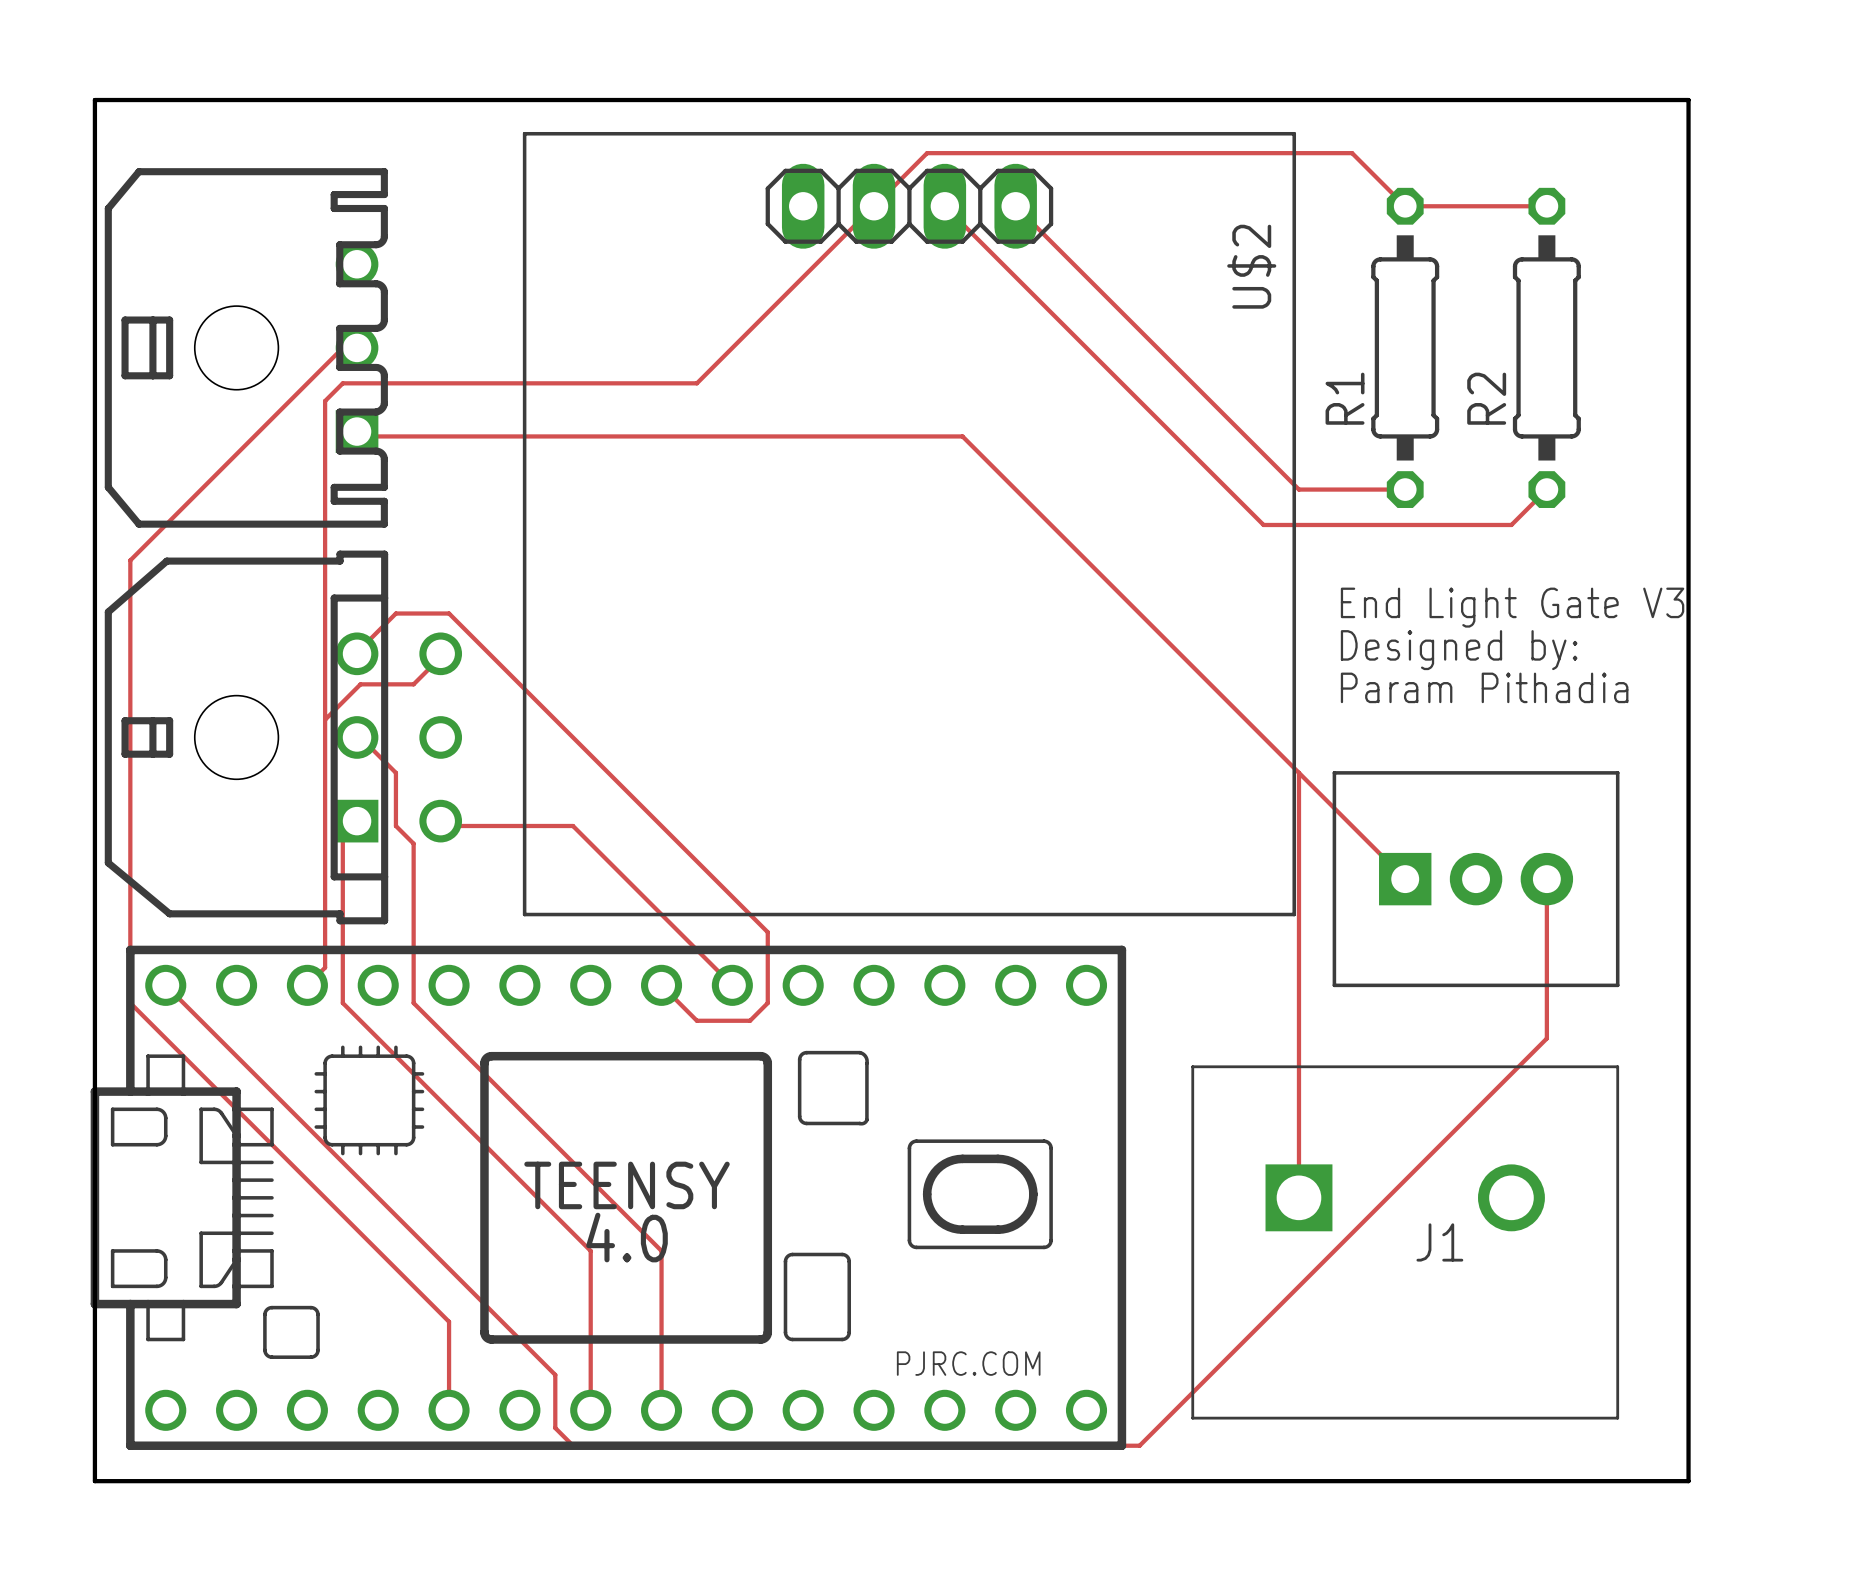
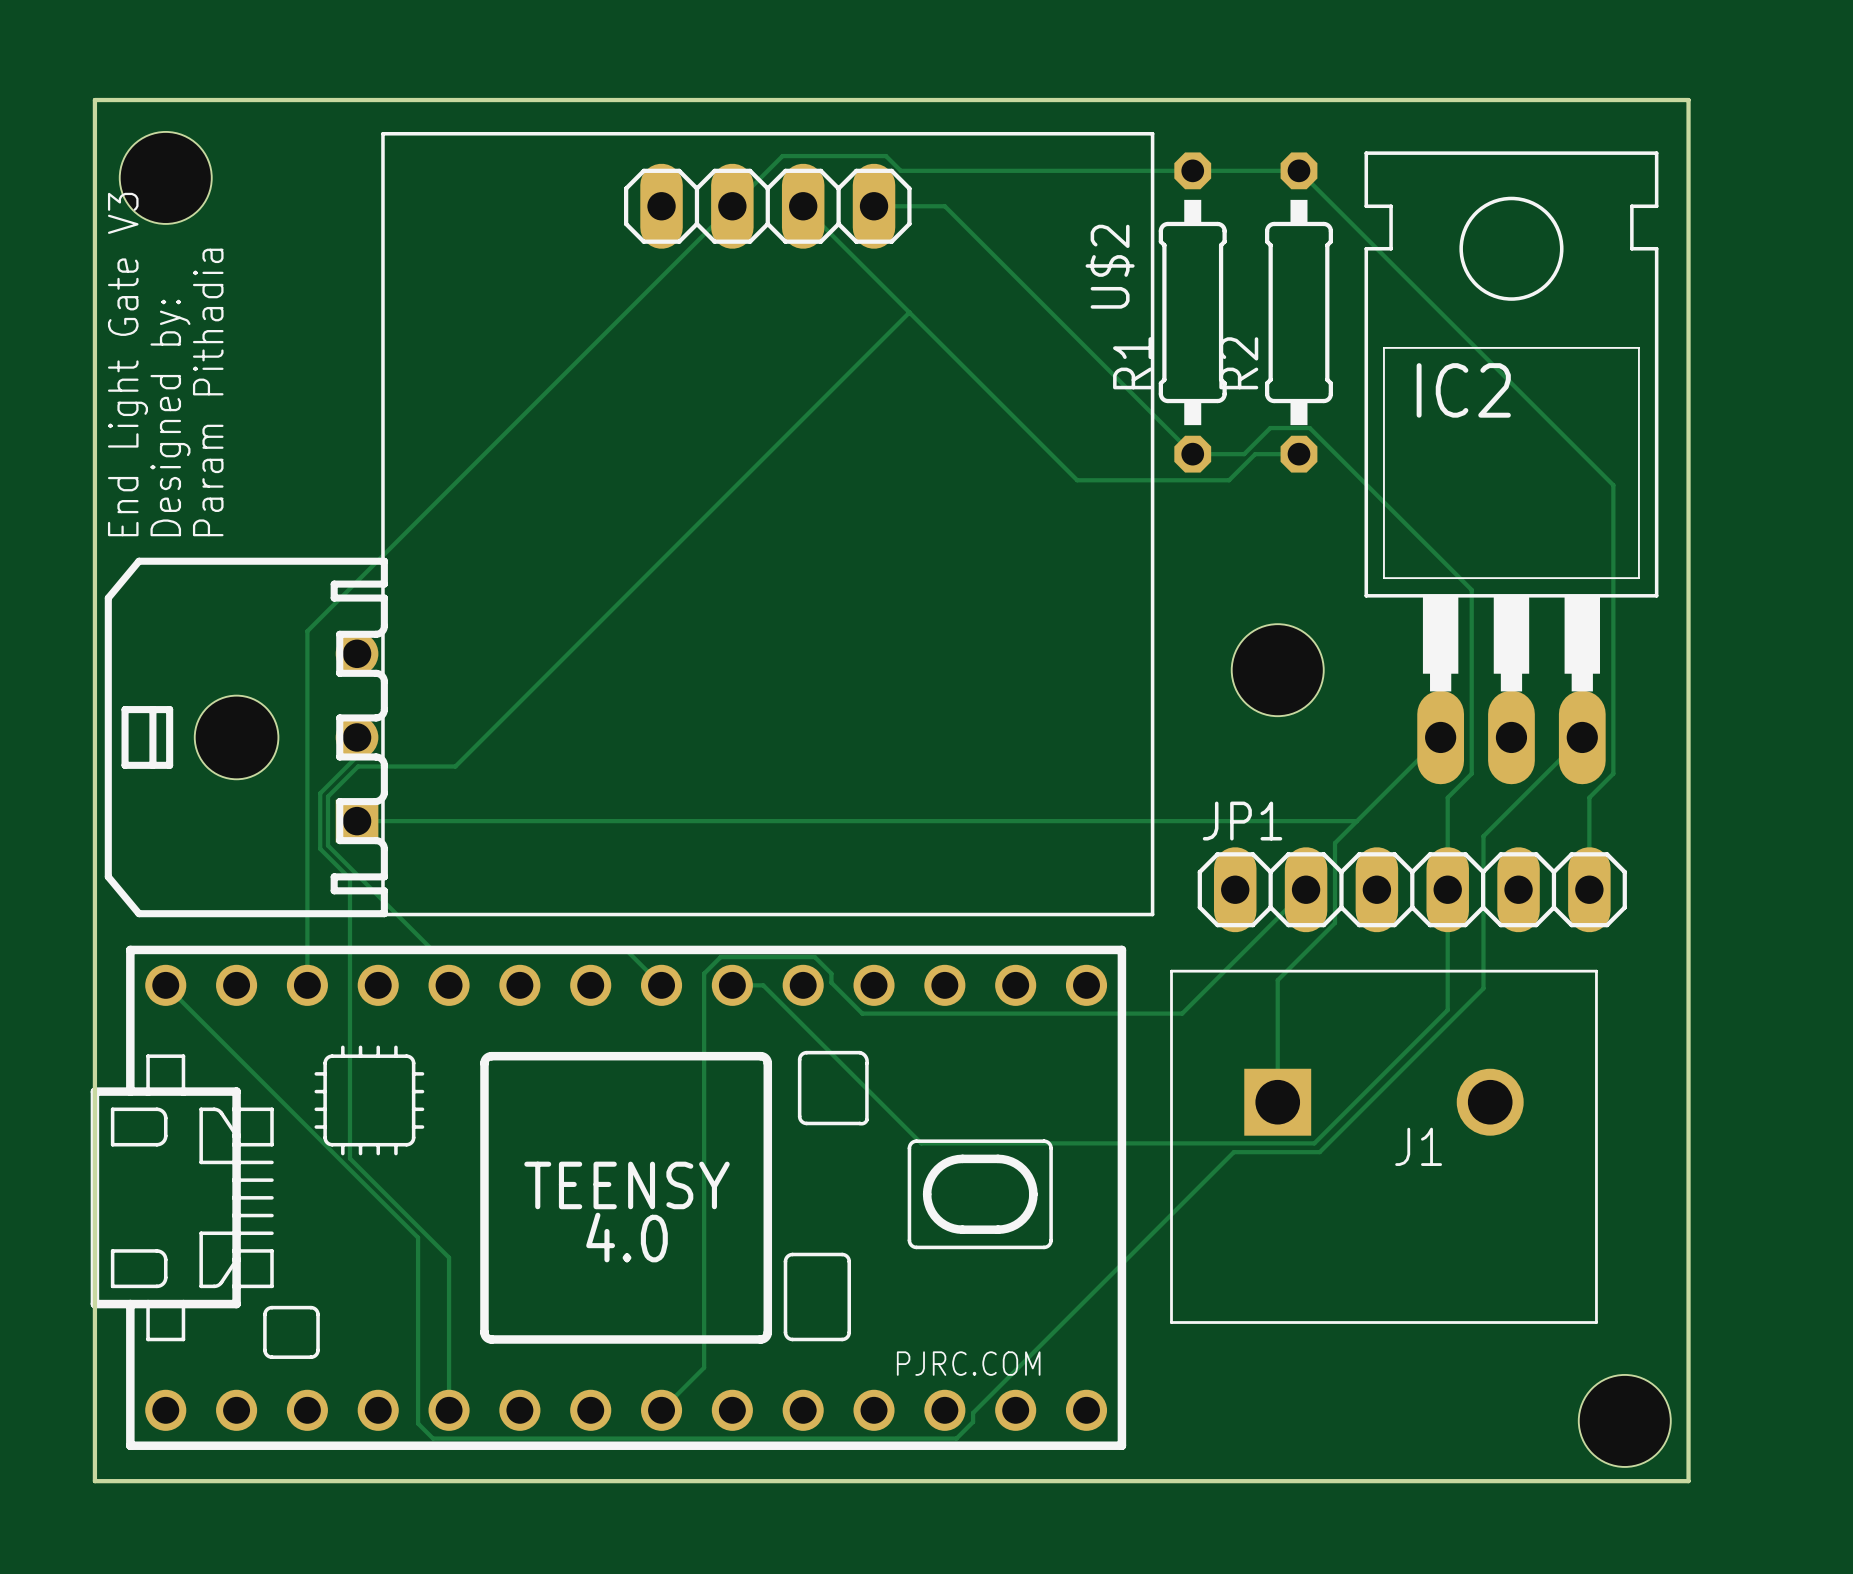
hole: none -> (165, 177)
track: none -> (803, 206) (1077, 480) (1229, 480) (1255, 454) (1298, 454)
track: none -> (874, 206) (944, 206)
track: (1015, 206) (1298, 489) (1405, 489) -> none
track: (1546, 206) (1405, 206) (1352, 153) (927, 153) (696, 383) (342, 383) (325, 401) (325, 967) (307, 985) -> (1589, 889) (1589, 797) (1613, 773) (1613, 485) (1298, 170) (900, 170) (886, 156) (782, 156) (307, 631) (307, 985)
part position: (246, 347) -> (246, 737)
track: (357, 347) (342, 347) (130, 560) (130, 1003) (449, 1321) -> none
R1 position: (1405, 347) -> (1192, 312)
R2 position: (1546, 347) -> (1298, 312)
text: none -> End Light Gate V3 (127, 364)
text: none -> Param Pithadia (208, 392)
text: none -> Designed by: (170, 417)
track: (357, 431) (360, 436) (962, 436) (1405, 879) -> none
track: (1192, 454) (1263, 524) (1511, 524) (1546, 489) -> none
IC2: none -> (1511, 467)
U$2 position: (909, 524) -> (767, 524)
text: End Light Gate V3 (1512, 607) -> none
text: Designed by: (1459, 650) -> none
track: (357, 653) (395, 613) (449, 613) (767, 932) (767, 1003) (750, 1020) (696, 1020) (661, 985) -> (909, 312) (455, 766) (358, 766) (328, 796) (328, 845) (432, 949) (626, 949) (661, 985)
track: (440, 653) (431, 666) (413, 684) (360, 684) (325, 719) -> none
hole: none -> (1277, 670)
text: Param Pithadia (1484, 687) -> none
part: (283, 737) -> none
track: (357, 737) (360, 737) (395, 772) (395, 825) (413, 843) (413, 1003) (661, 1250) (661, 1410) -> (357, 737) (357, 756) (320, 793) (320, 848) (349, 878) (349, 1158) (449, 1257) (449, 1321)
track: none -> (1440, 737) (1335, 843) (1335, 922) (1277, 980) (1277, 1102)
track: (1298, 772) (1298, 1197) -> none
track: (357, 821) (342, 825) (342, 1003) (590, 1250) (590, 1410) -> (357, 821) (1356, 821)
track: (440, 821) (449, 825) (573, 825) (732, 985) -> (1192, 454) (1244, 454) (1270, 428) (1309, 428) (1471, 589) (1471, 773) (1447, 797) (1447, 1010) (1314, 1143) (921, 1143) (763, 985) (732, 985)
part: (1476, 879) -> none
track: (1546, 879) (1546, 1038) (1139, 1445) (573, 1445) (555, 1428) (555, 1374) (418, 1237) -> (1582, 737) (1483, 836) (1483, 988) (1319, 1152) (1233, 1152) (973, 1412) (973, 1422) (956, 1438) (433, 1438) (418, 1423) (418, 1237)
track: none -> (1306, 889) (1182, 1013) (862, 1013) (831, 982) (831, 973) (814, 957) (720, 957) (704, 973) (704, 1367) (661, 1410)
JP1: none -> (1412, 889)
J1 position: (1405, 1242) -> (1383, 1146)
hole: none -> (1624, 1420)

